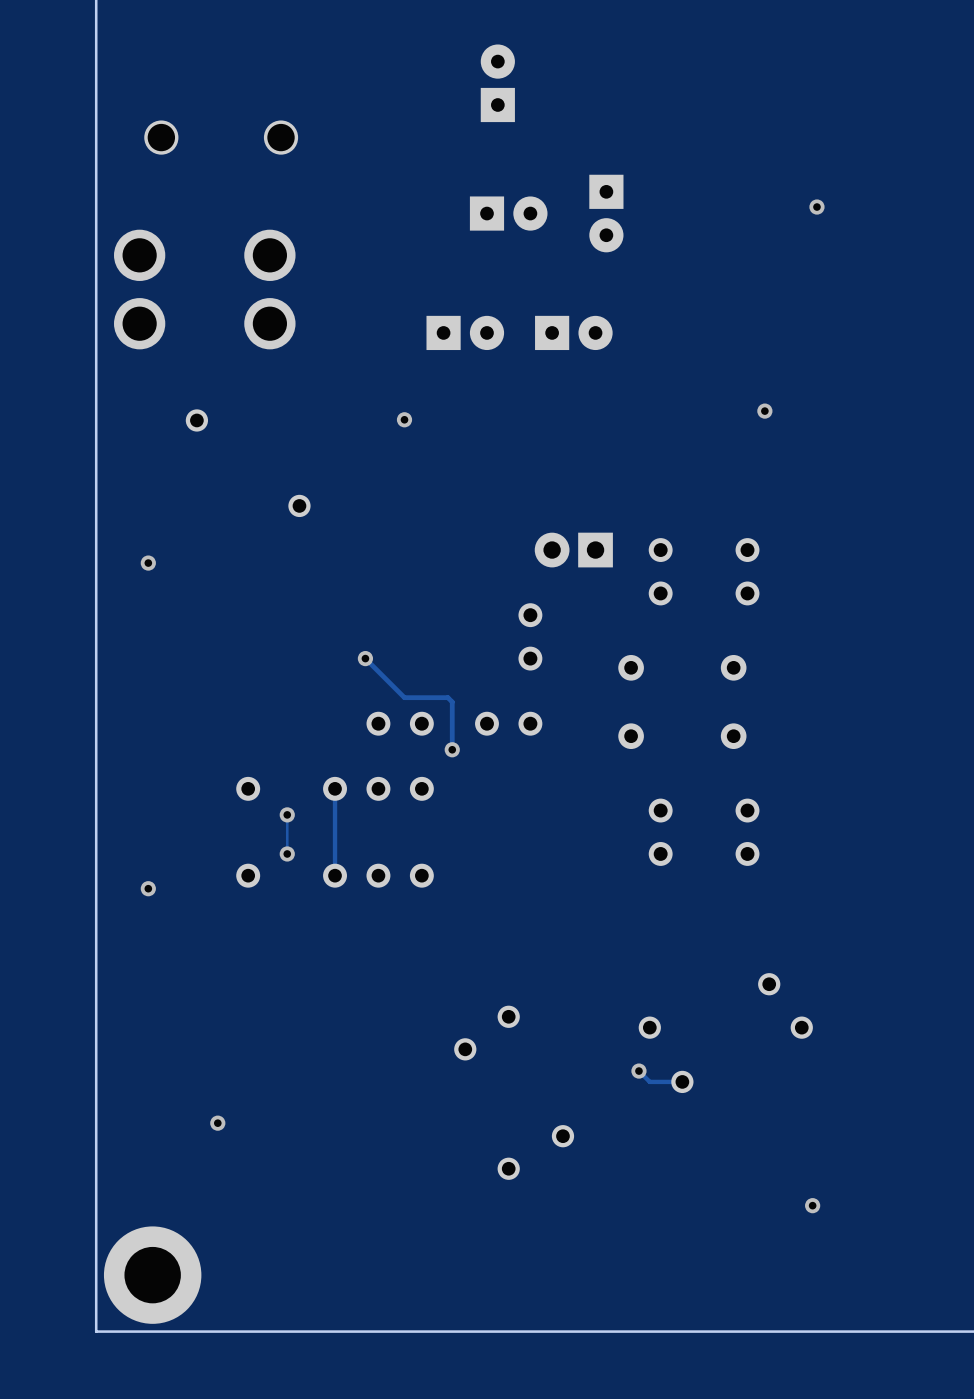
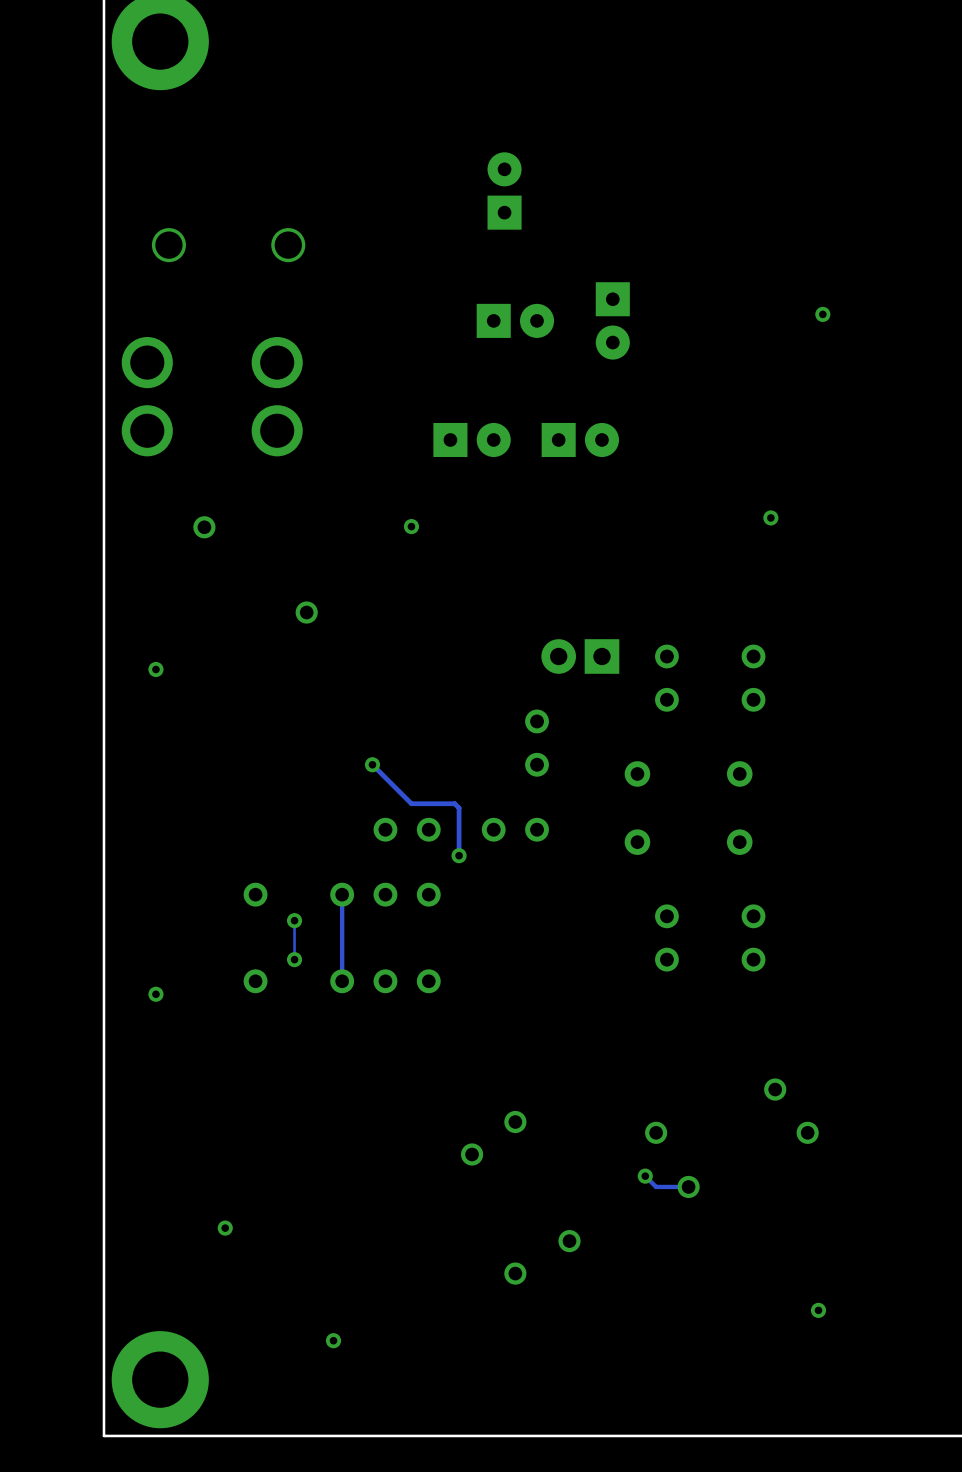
via: none -> (333, 1340)

